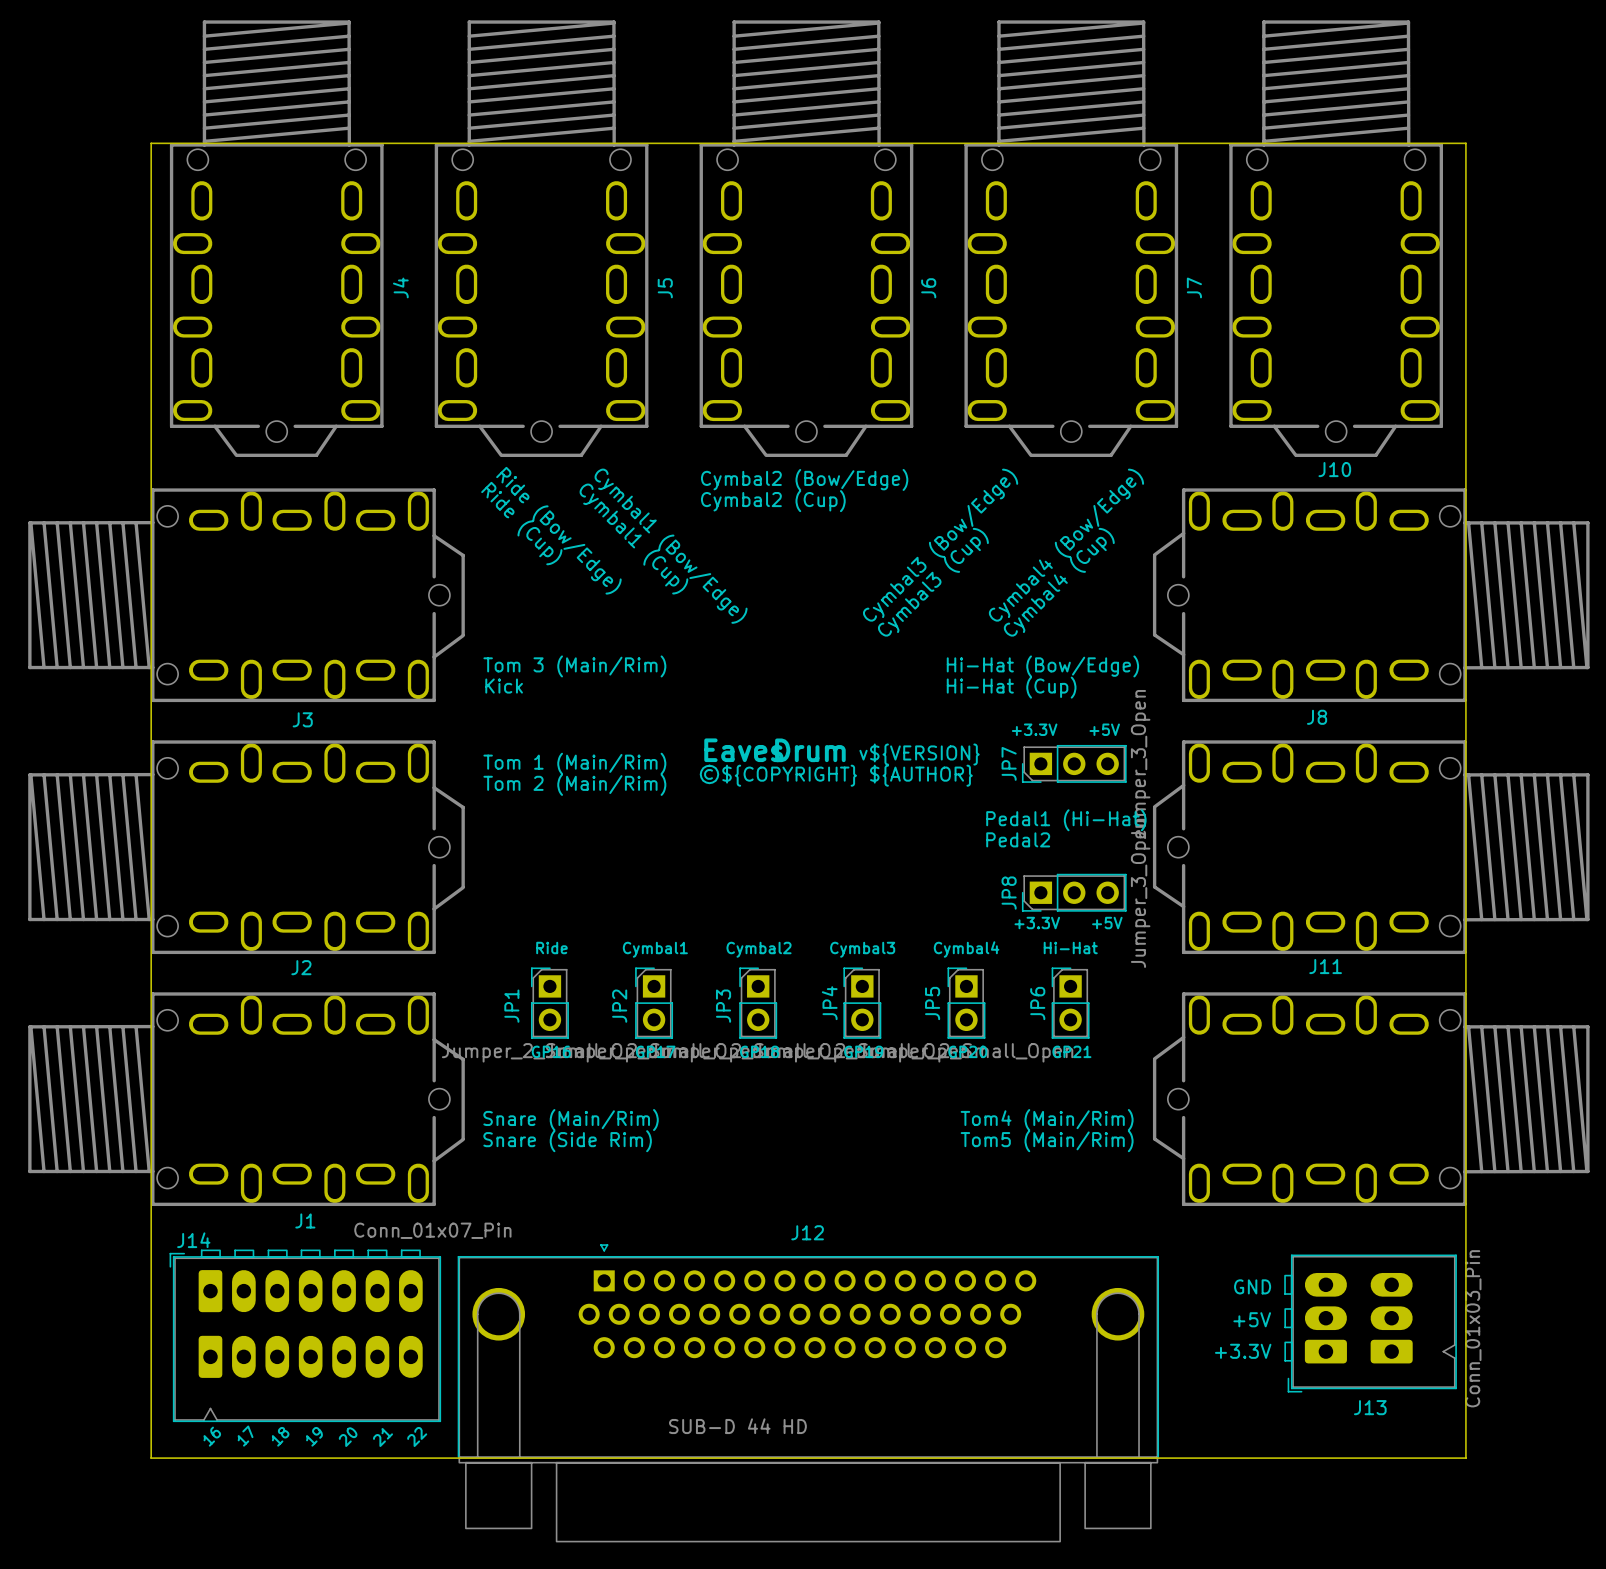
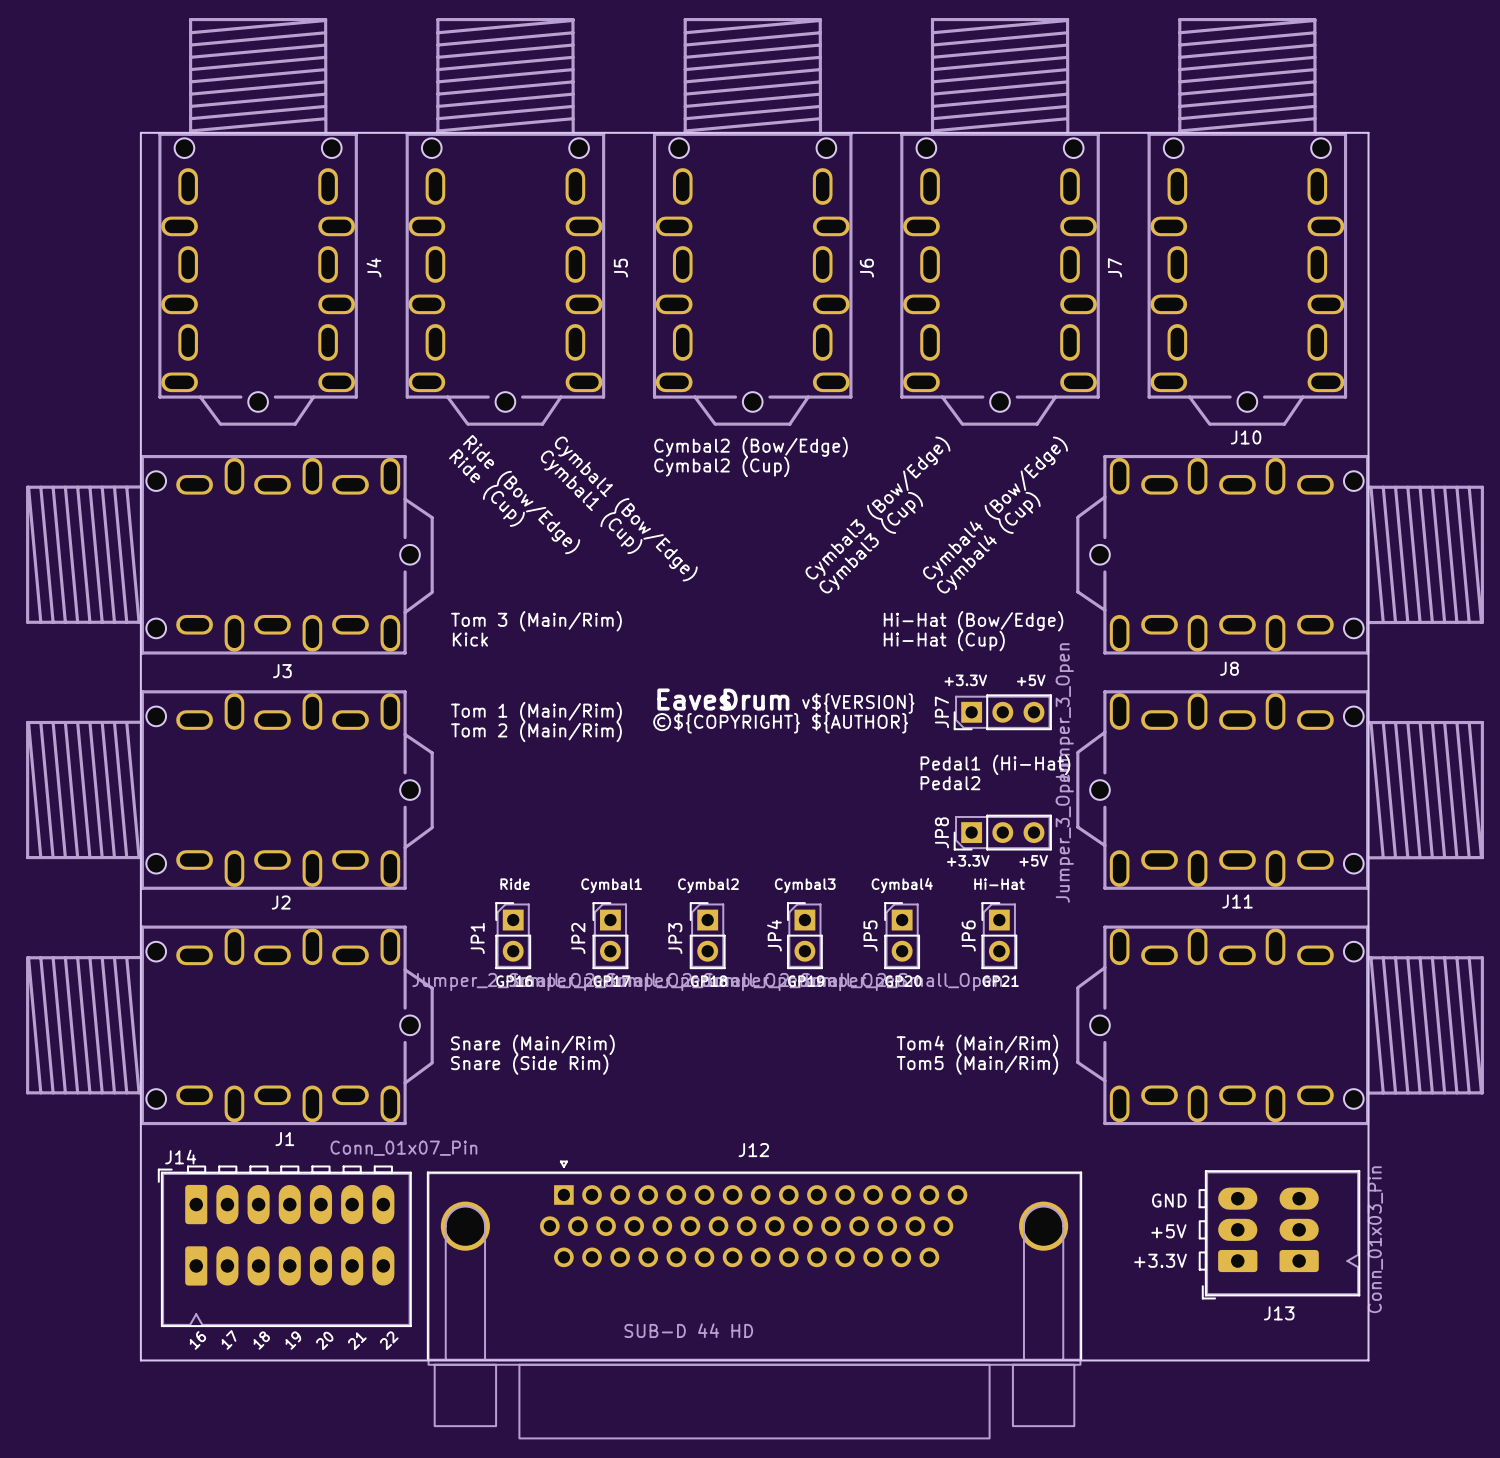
J4 footprint: [169, 20, 384, 457] -> [158, 18, 358, 426]
J5 footprint: [434, 20, 649, 457] -> [405, 18, 606, 426]
J6 footprint: [699, 20, 914, 457] -> [652, 18, 853, 426]
J7 footprint: [964, 20, 1179, 457] -> [900, 18, 1100, 426]
J10 footprint: [1229, 20, 1444, 457] -> [1147, 18, 1348, 426]
J3 footprint: [28, 488, 465, 703] -> [26, 454, 434, 655]
J8 footprint: [1152, 488, 1590, 703] -> [1076, 454, 1484, 655]
J2 footprint: [28, 740, 465, 955] -> [26, 690, 434, 890]
J11 footprint: [1152, 740, 1590, 955] -> [1076, 690, 1484, 890]
J1 footprint: [28, 992, 465, 1207] -> [26, 925, 434, 1126]
part footprint: [1152, 992, 1590, 1207] -> [1076, 925, 1484, 1126]

